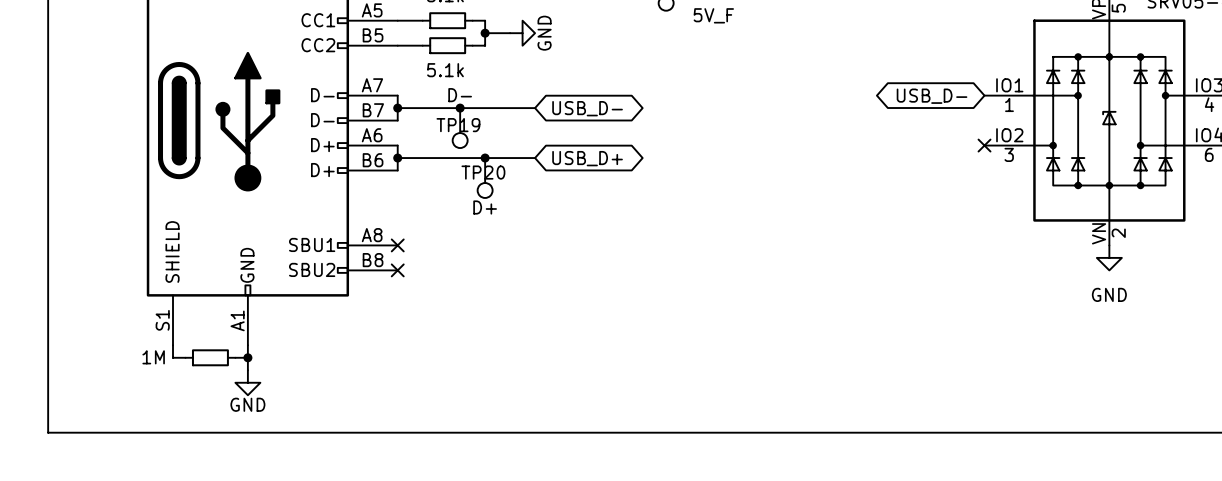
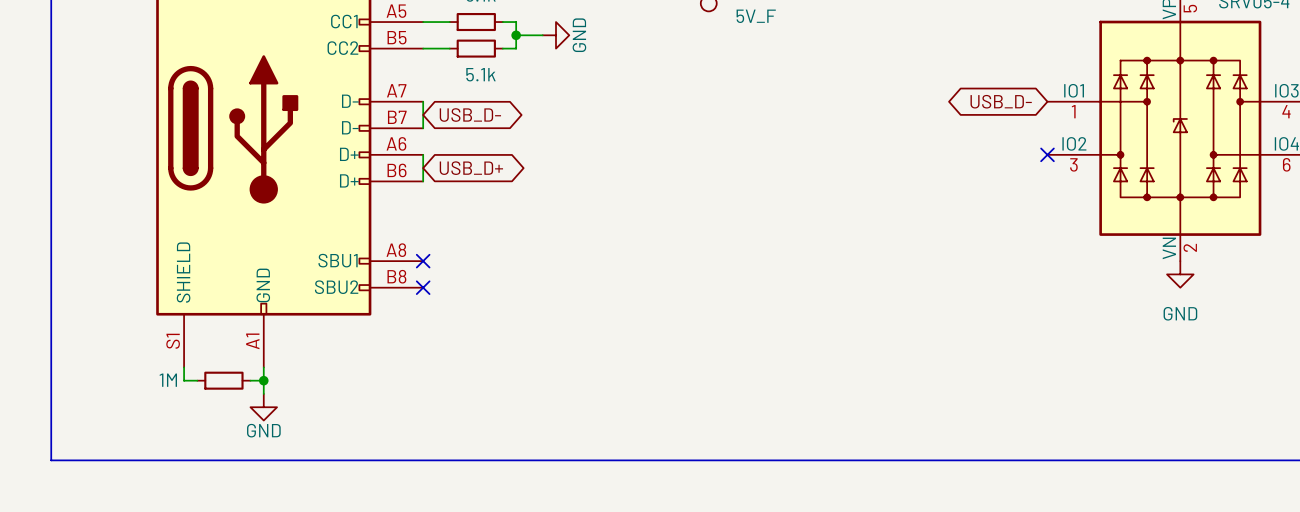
wire: (397, 108) (535, 108) -> none
junction: (397, 108) -> none
junction: (460, 108) -> none
global label position: USB_D- (587, 108) -> USB_D- (470, 115)
TP19: D- (460, 128) -> none
wire: (397, 158) (535, 158) -> none
junction: (397, 158) -> none
junction: (485, 158) -> none
global label position: USB_D+ (587, 158) -> USB_D+ (471, 168)
TP20: D+ (485, 178) -> none

